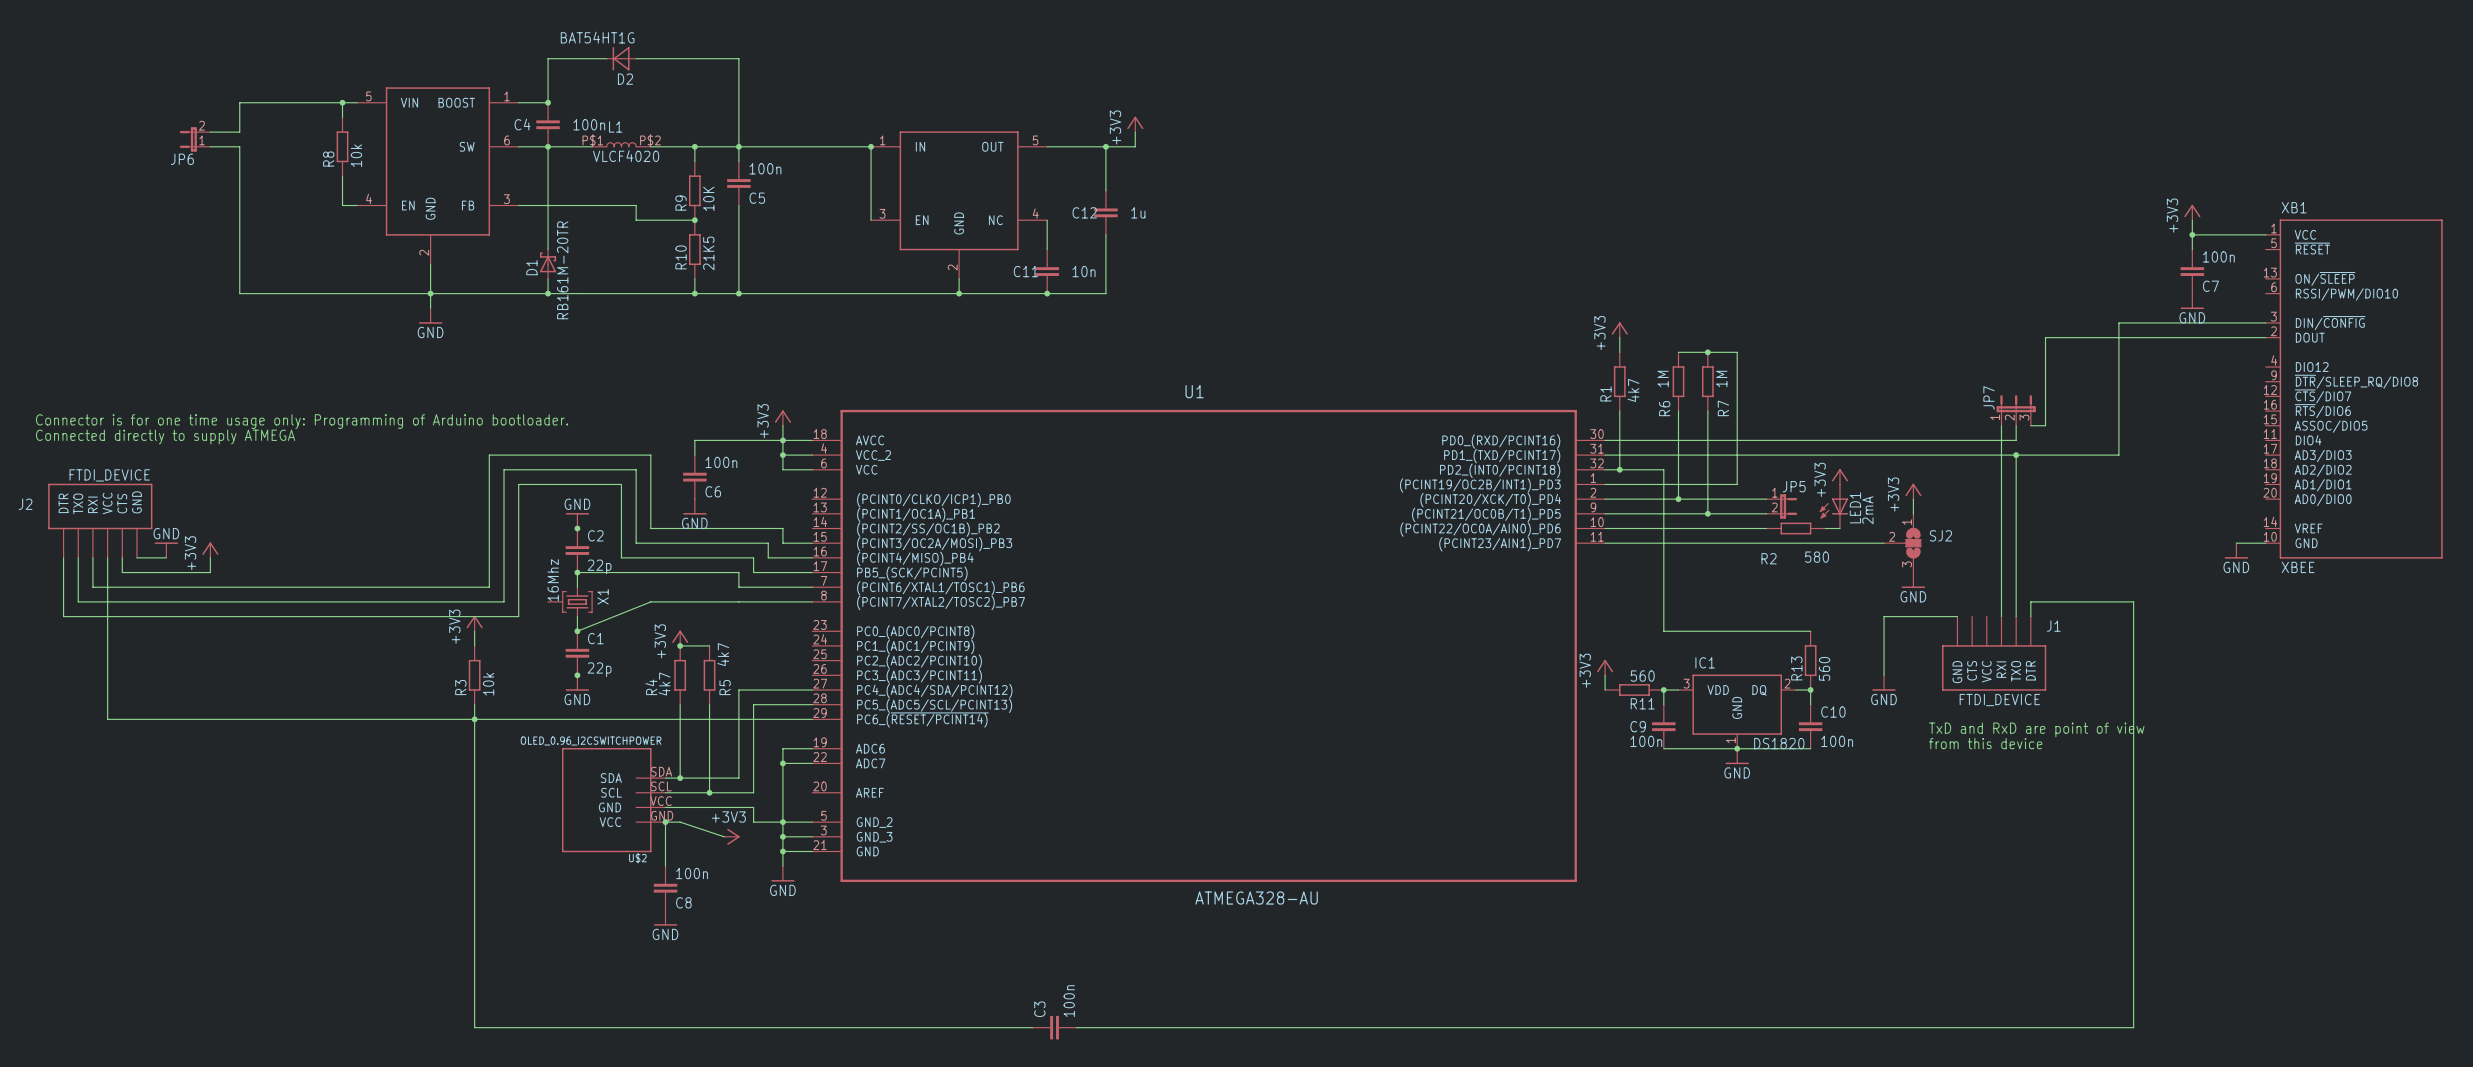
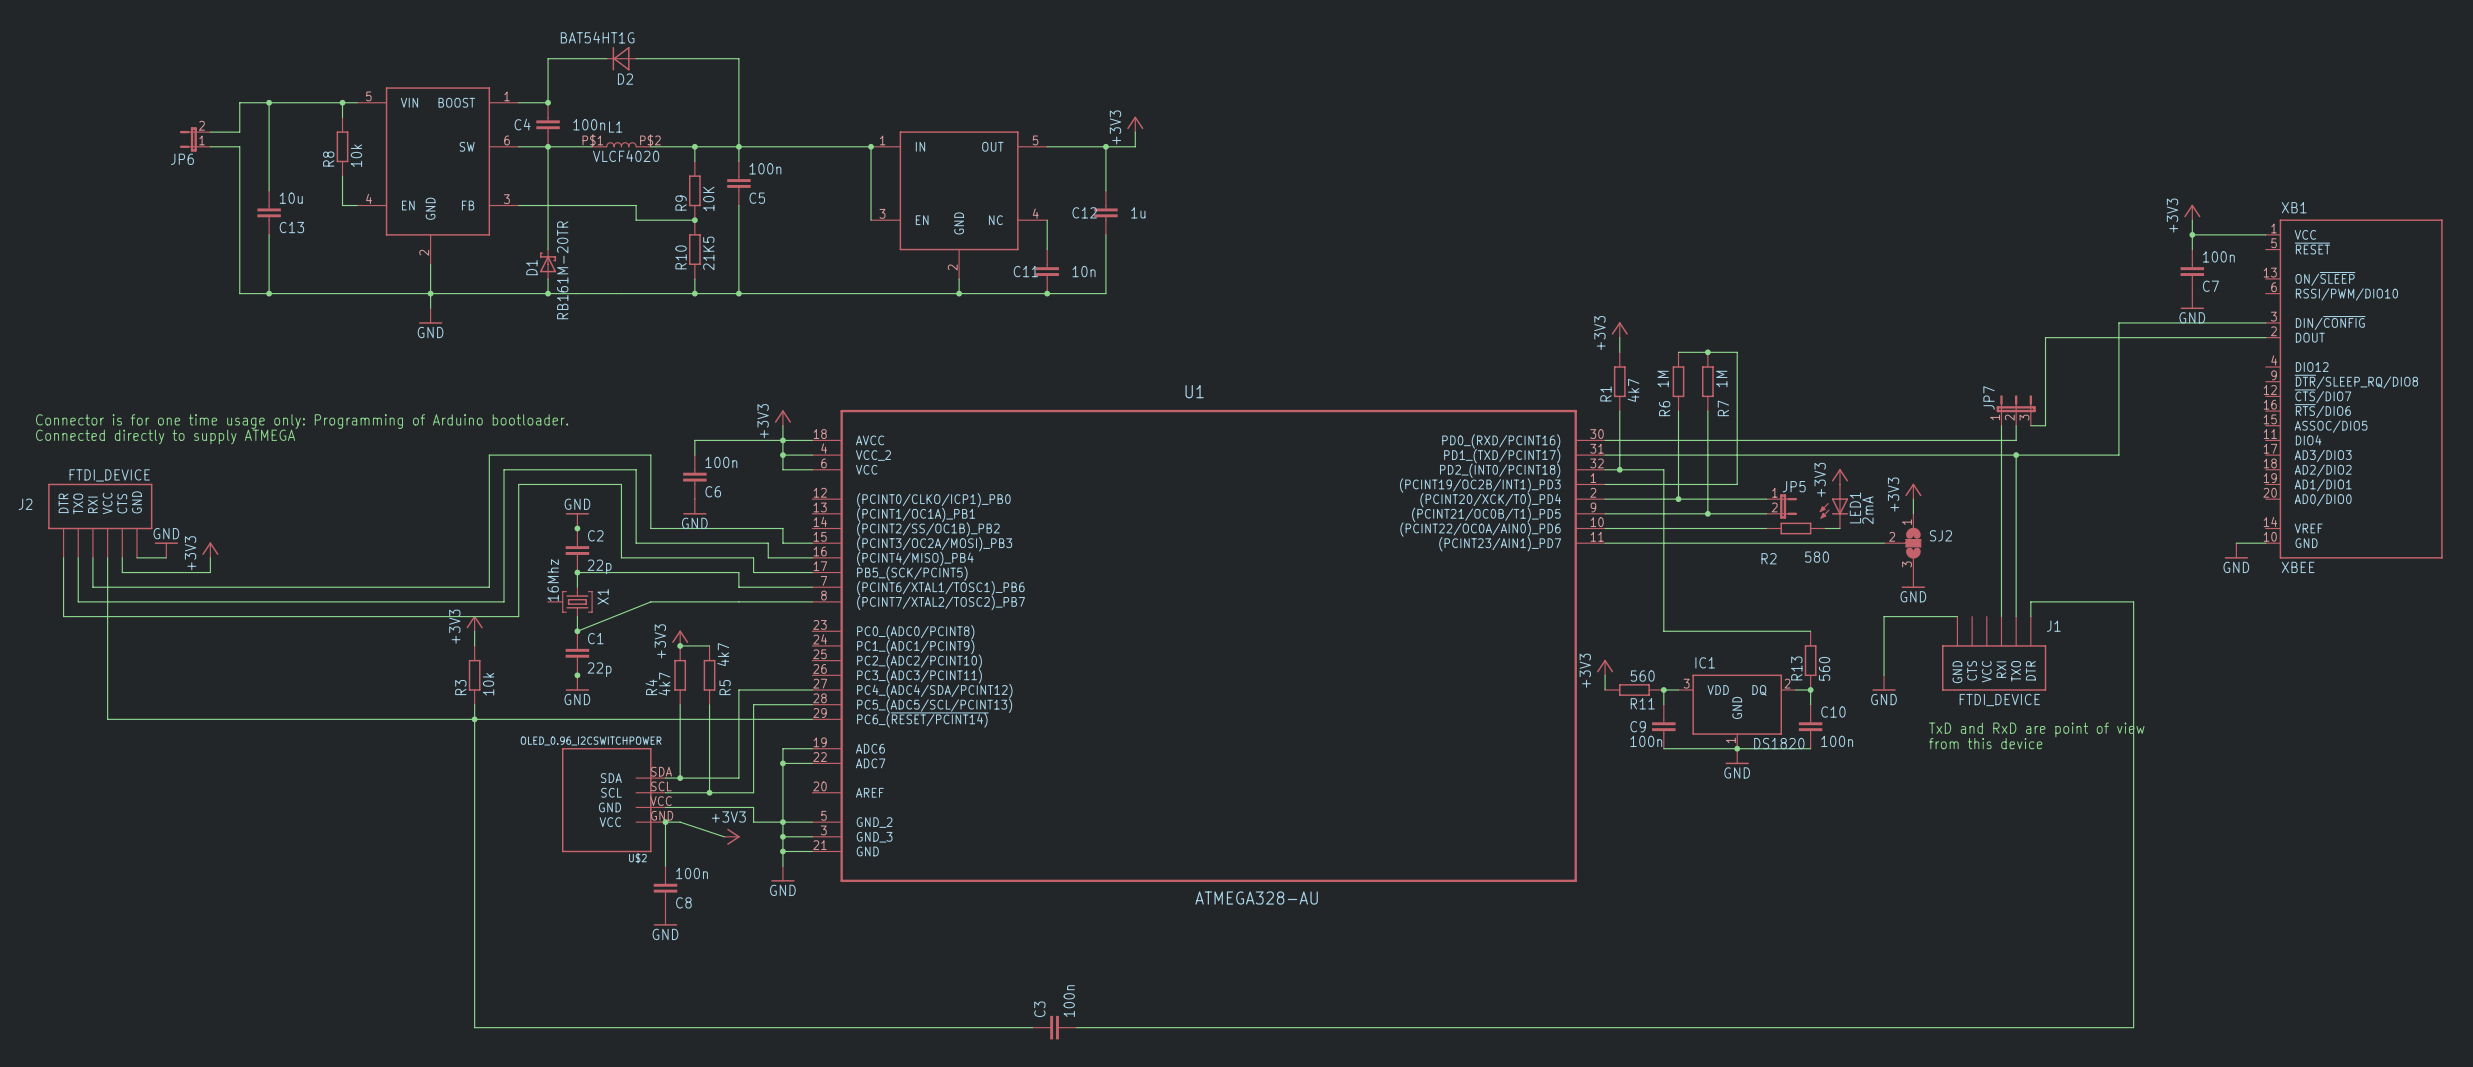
wire: none -> (269, 102) (269, 190)
junction: none -> (269, 102)
C13: none -> 10u (269, 212)
wire: none -> (269, 234) (269, 293)
junction: none -> (269, 293)

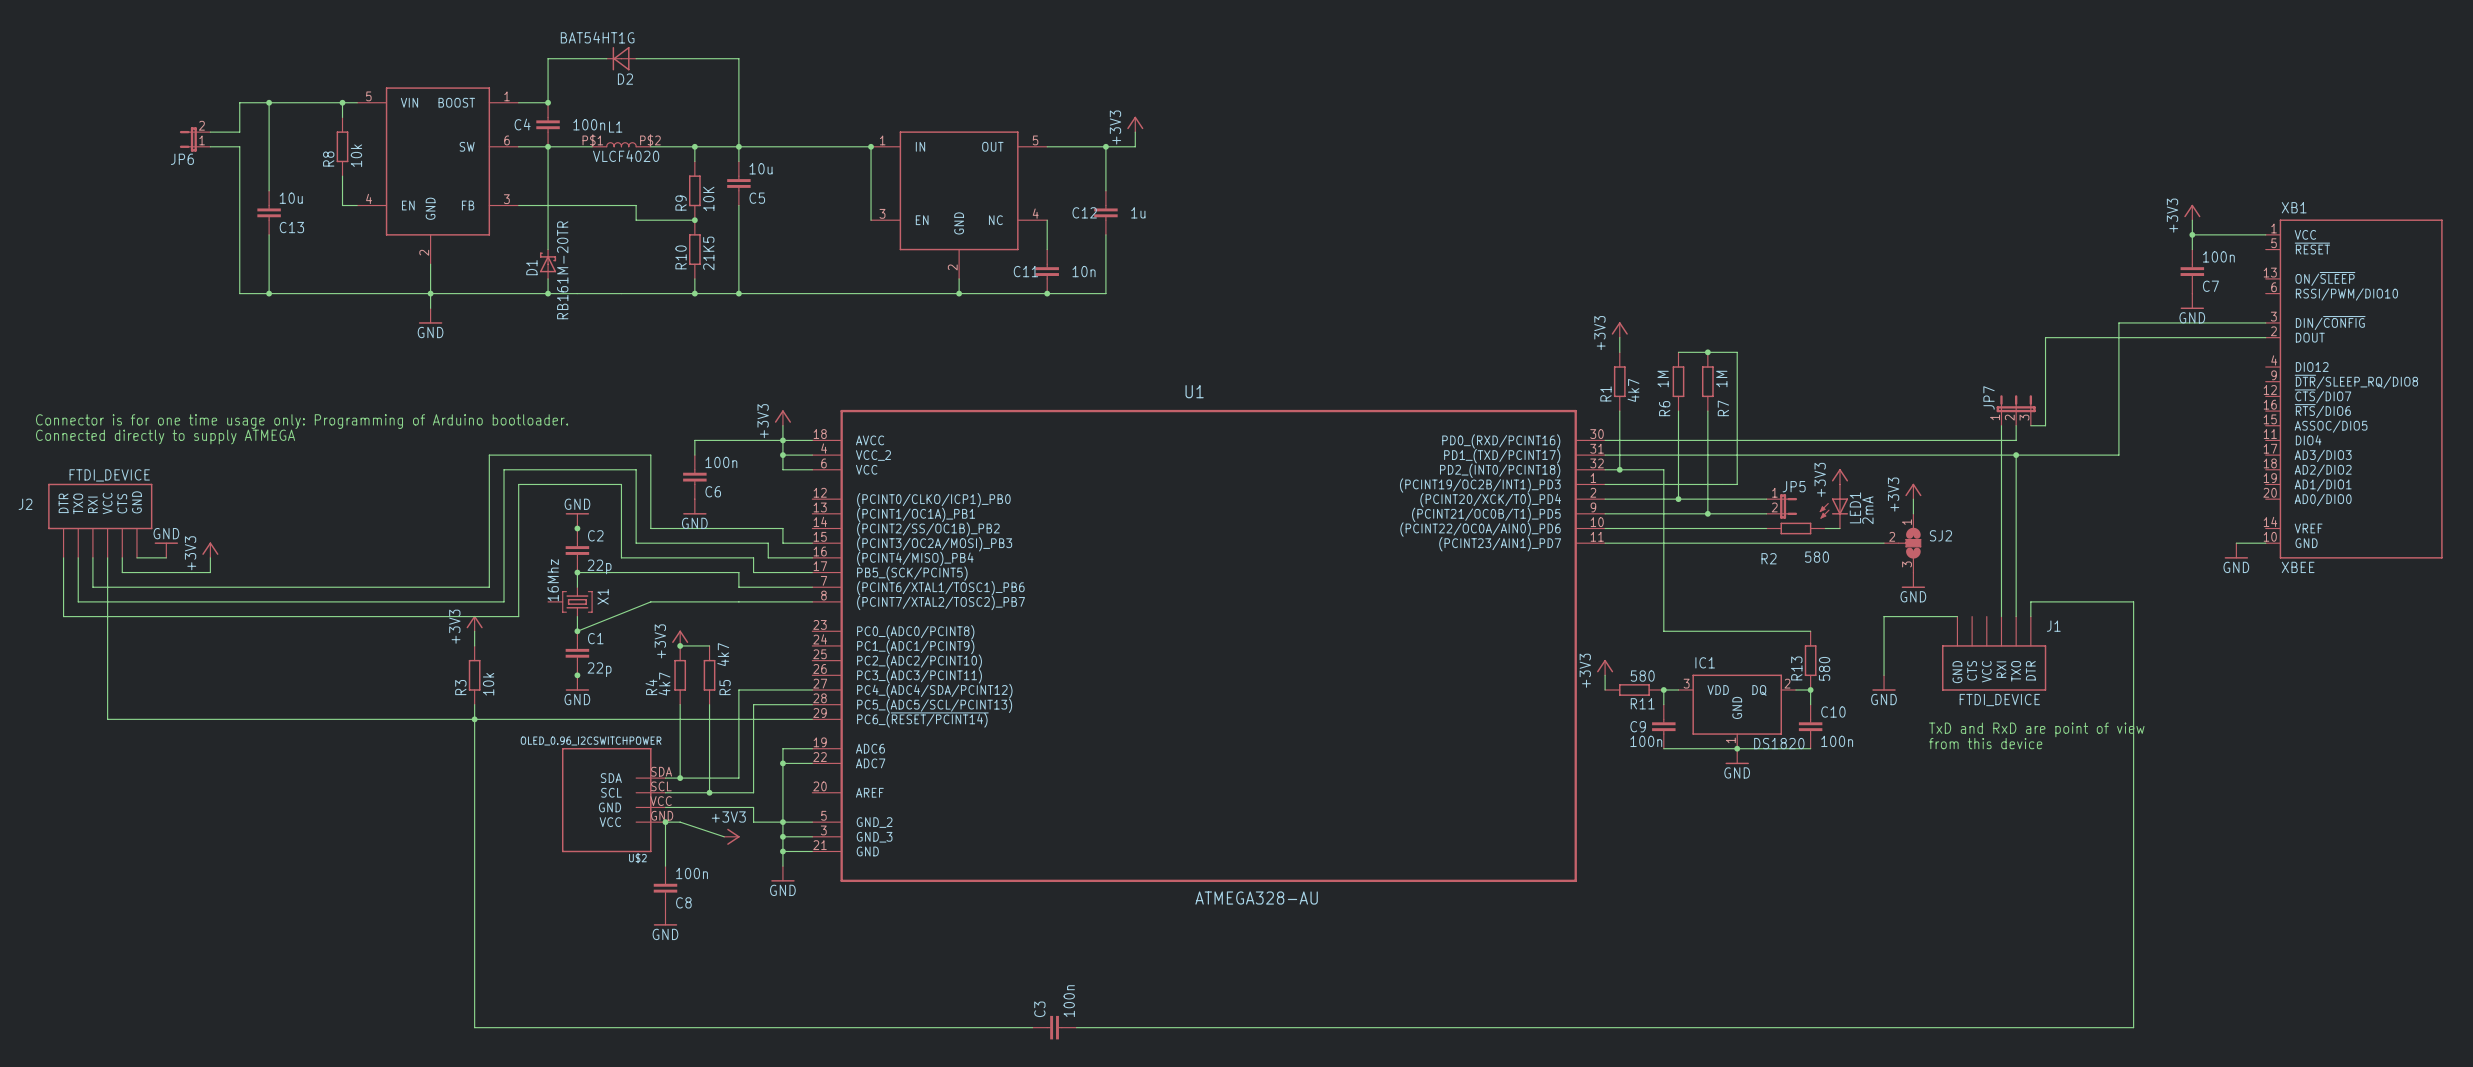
C5 value: 100n (765, 168) -> 10u (761, 168)
R13 value: 560 (1824, 668) -> 580 (1824, 668)
R11 value: 560 (1642, 676) -> 580 (1642, 676)

